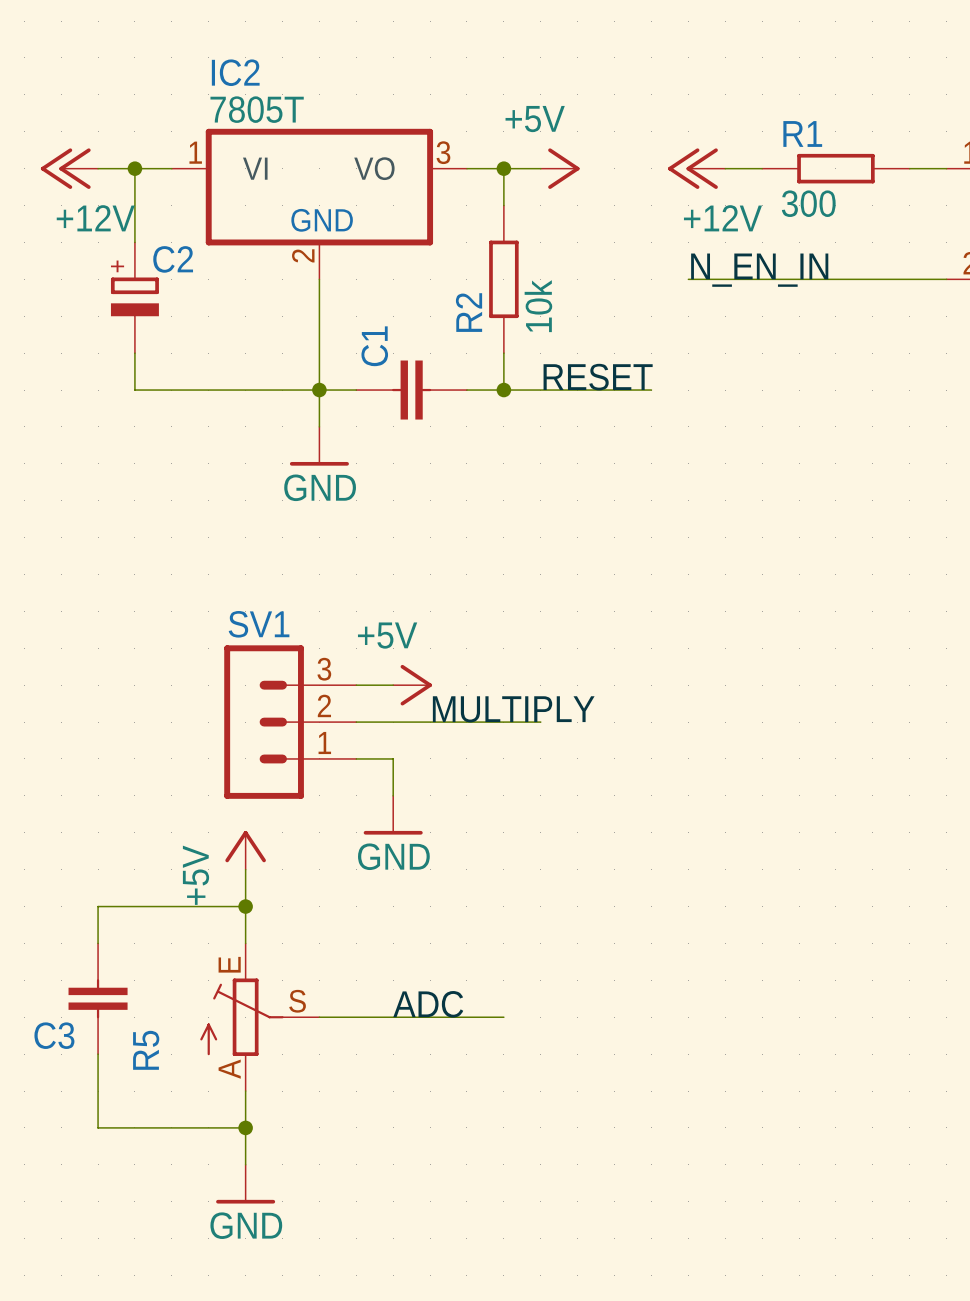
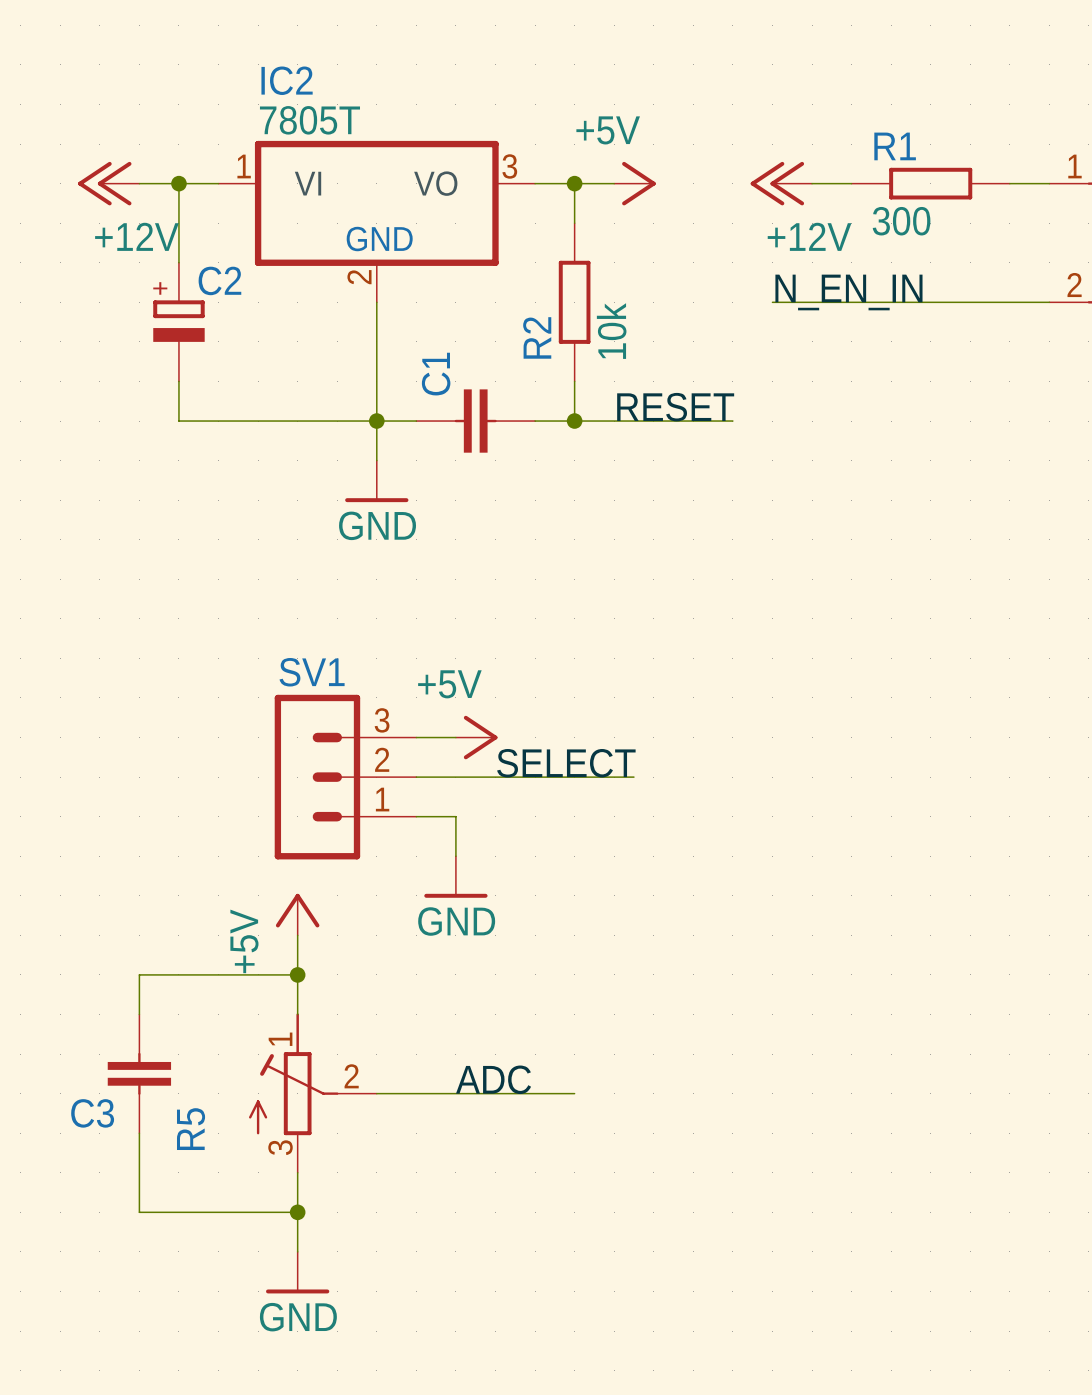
label: MULTIPLY (513, 709) -> SELECT (566, 763)
wire: none -> (614, 777) (633, 777)
R5 symbol: [200, 943, 320, 1092] -> [249, 1013, 377, 1173]

